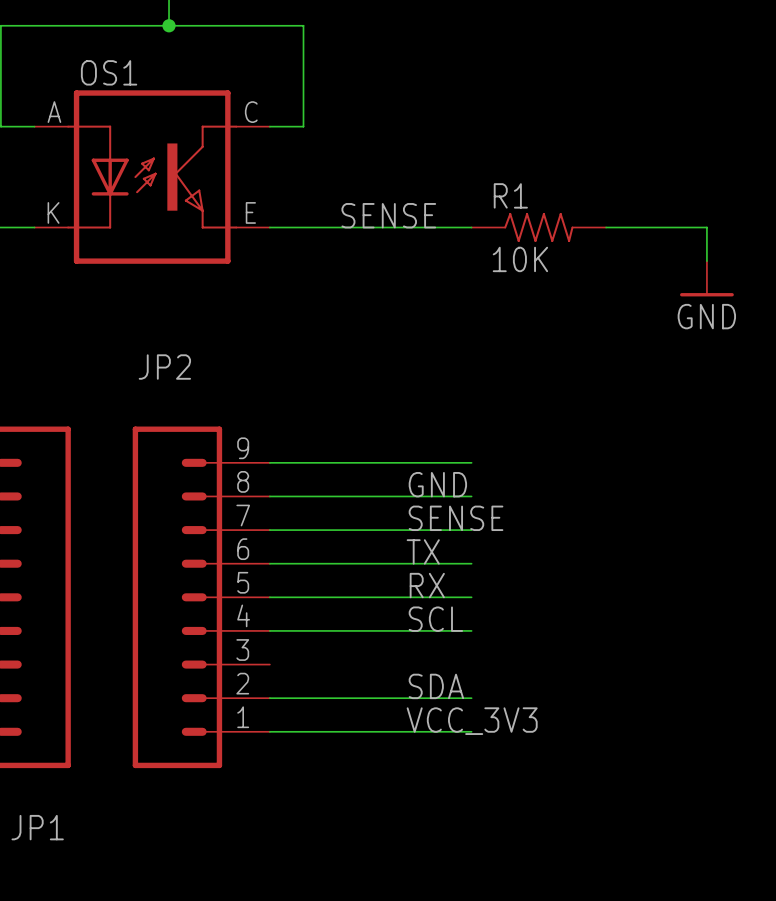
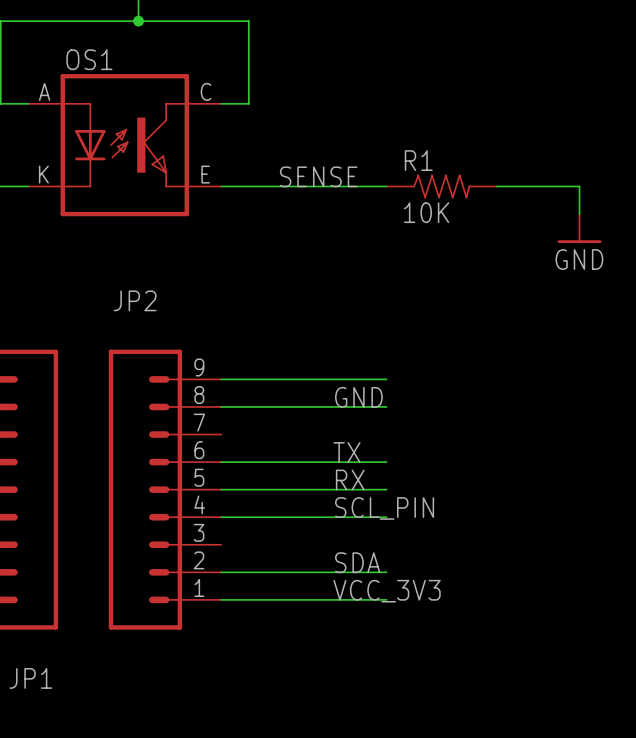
label: SENSE (456, 518) -> none
wire: (269, 530) (471, 530) -> none
label: SCL (435, 619) -> SCL_PIN (384, 508)

